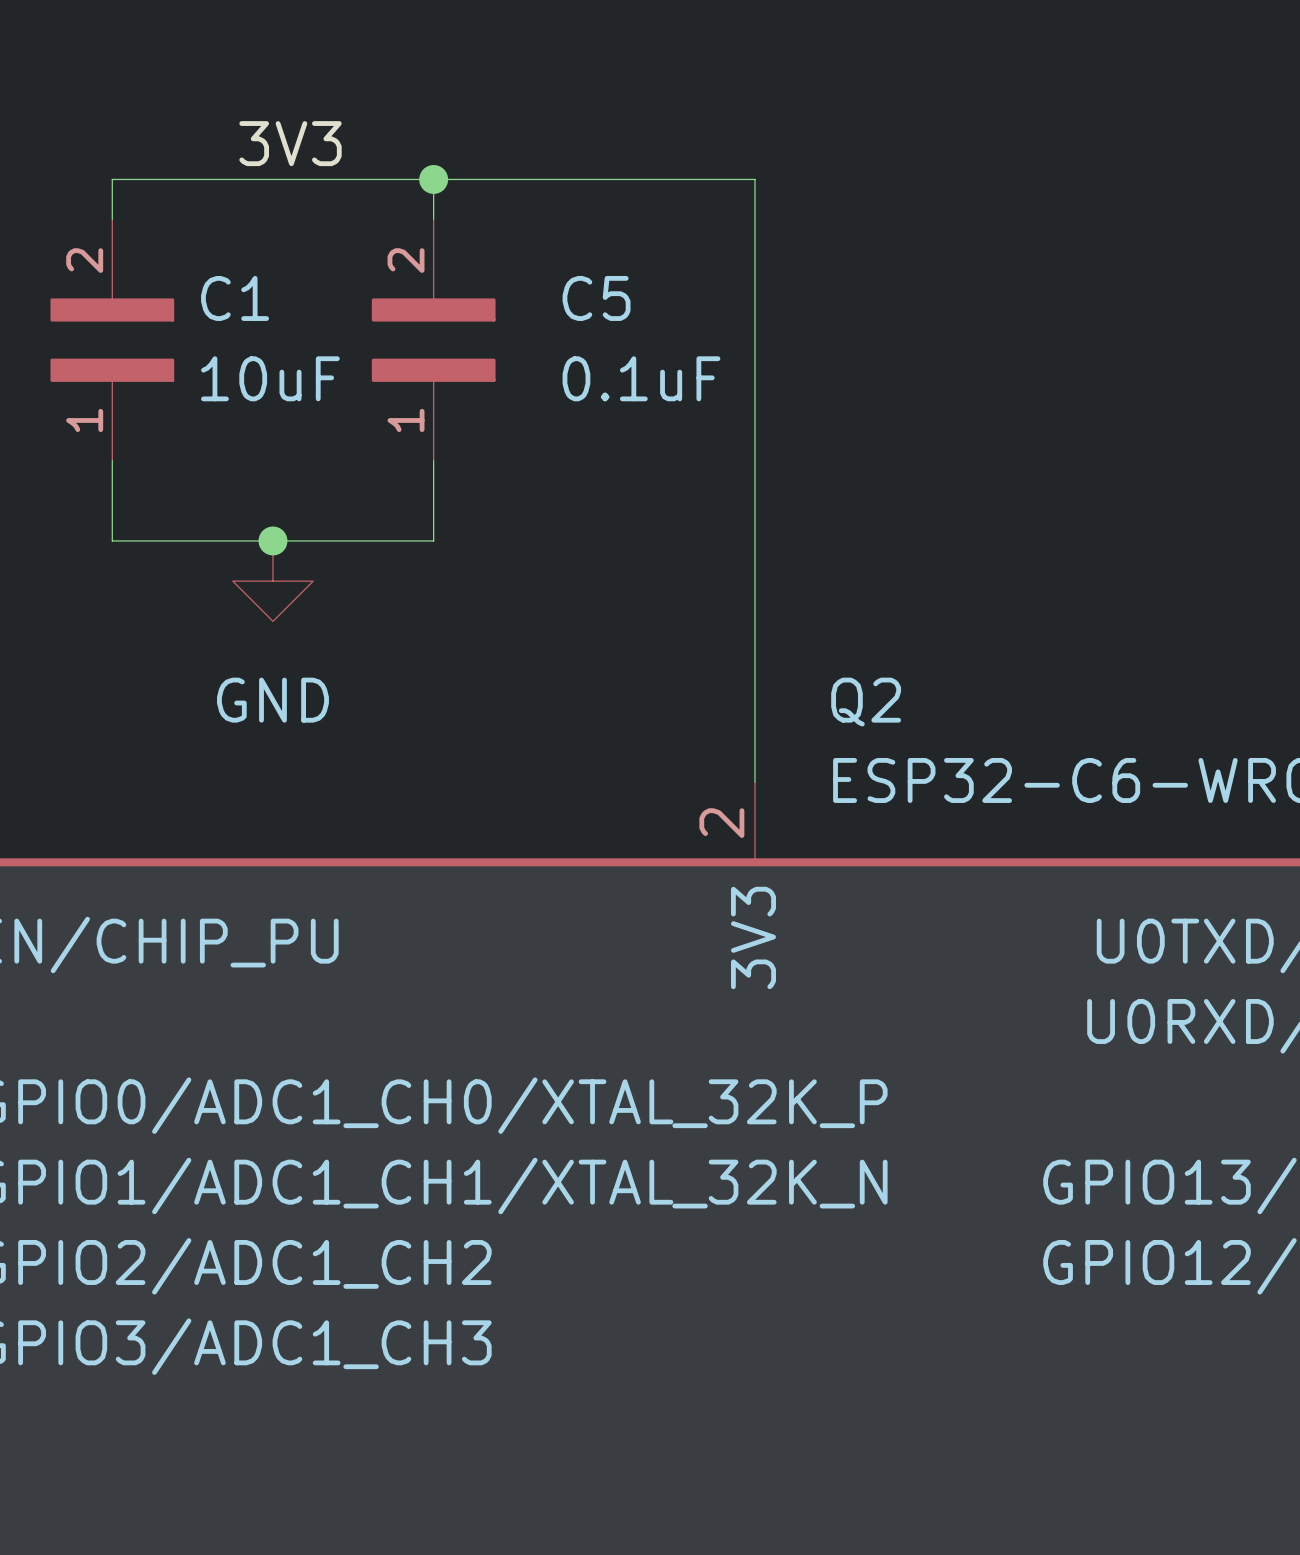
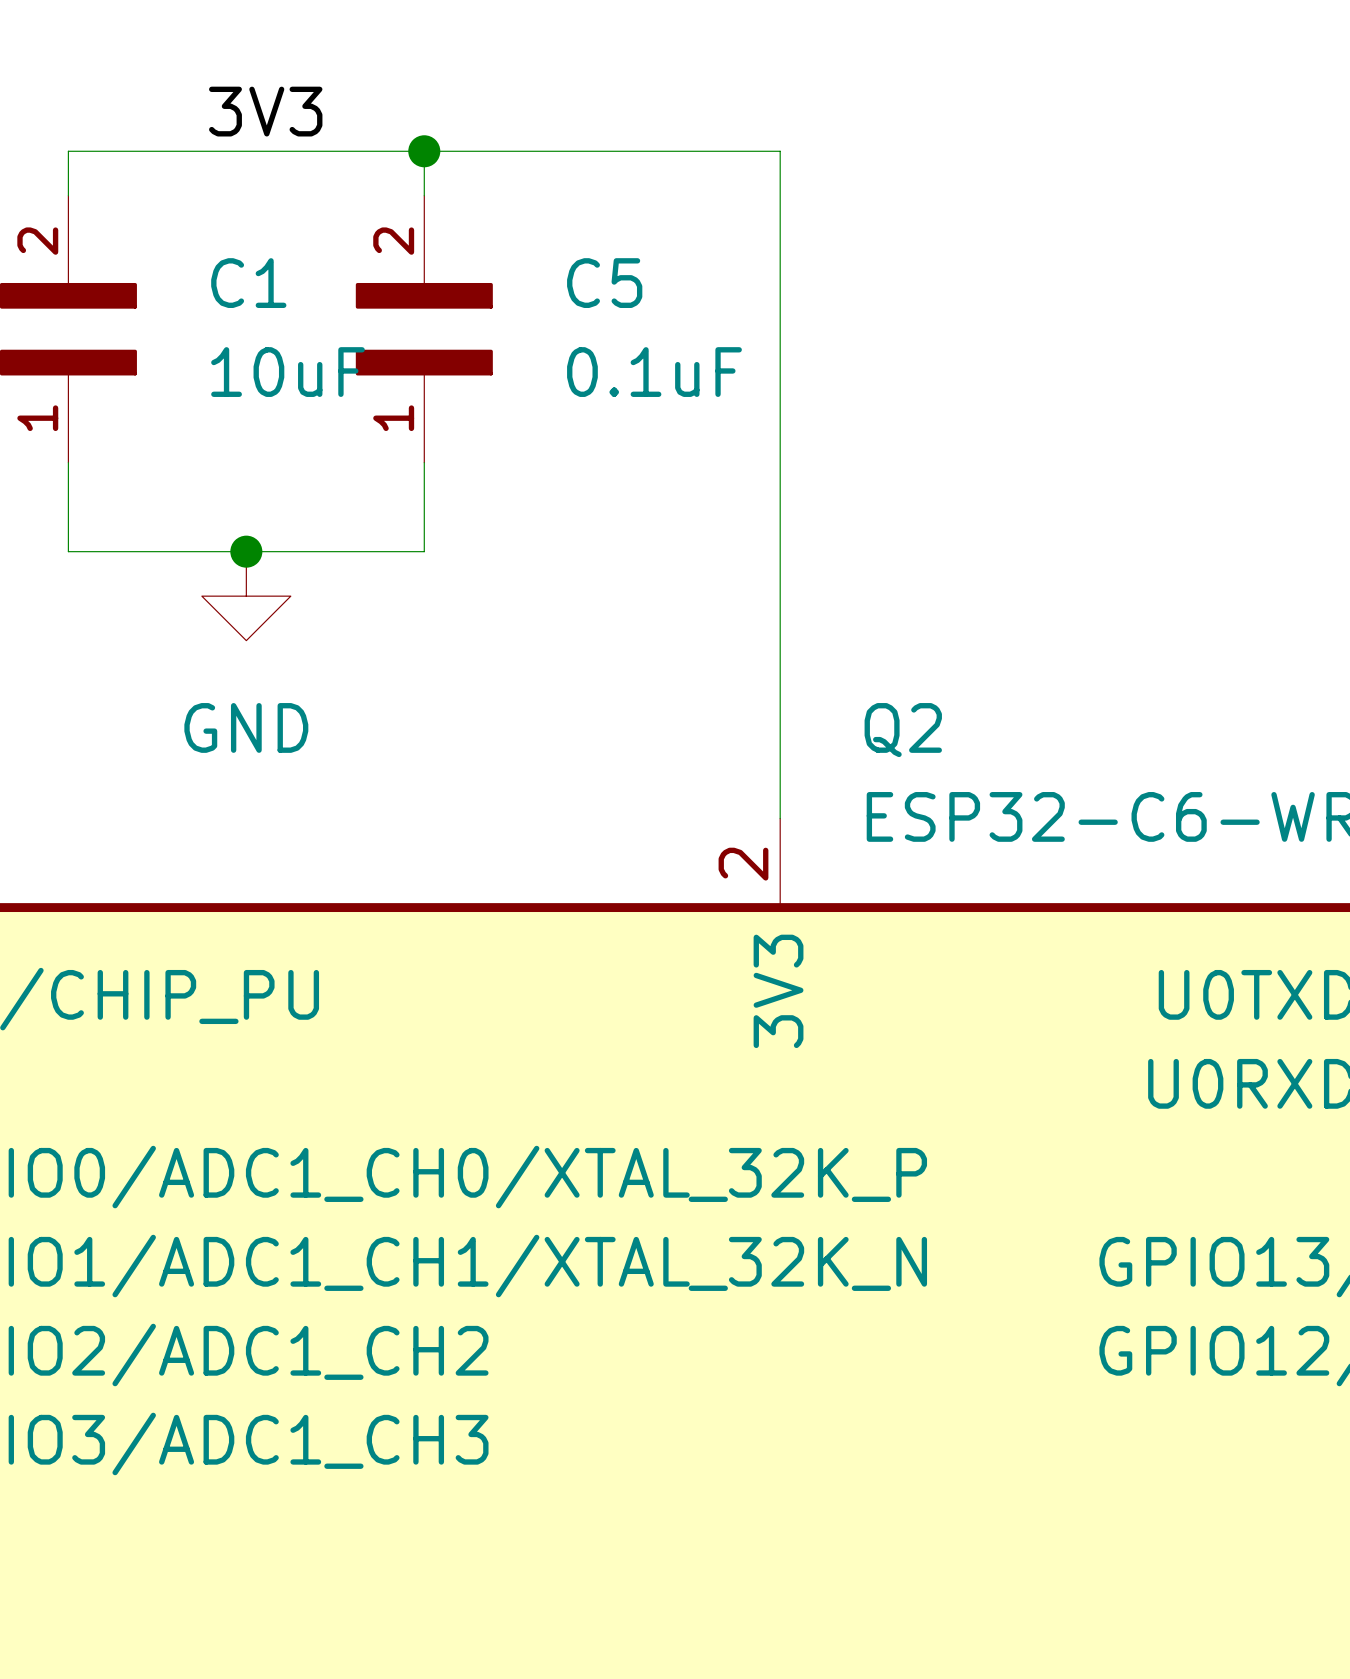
C1 name position: C1 (235, 298) -> C1 (248, 283)
C1 value position: 10uF (270, 378) -> 10uF (287, 372)

